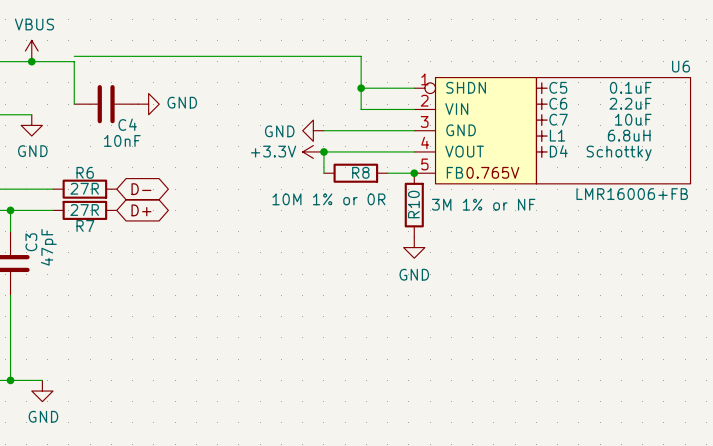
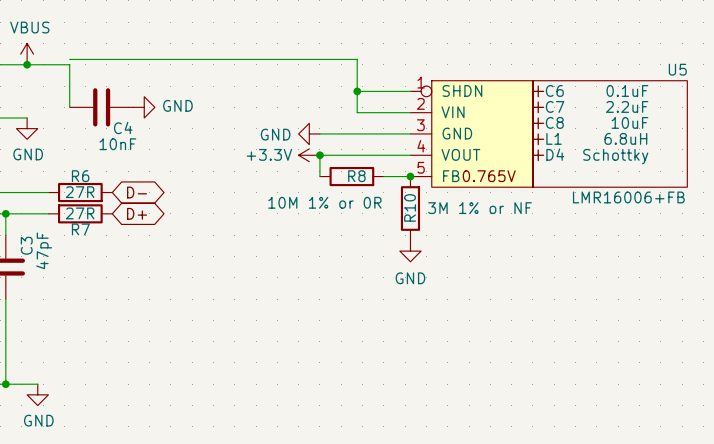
U6 name: U6 (681, 66) -> U5 (677, 69)
C5 name: C5 (558, 87) -> C6 (554, 90)
C6 name: C6 (558, 103) -> C7 (555, 106)
C7 name: C7 (558, 119) -> C8 (554, 122)

